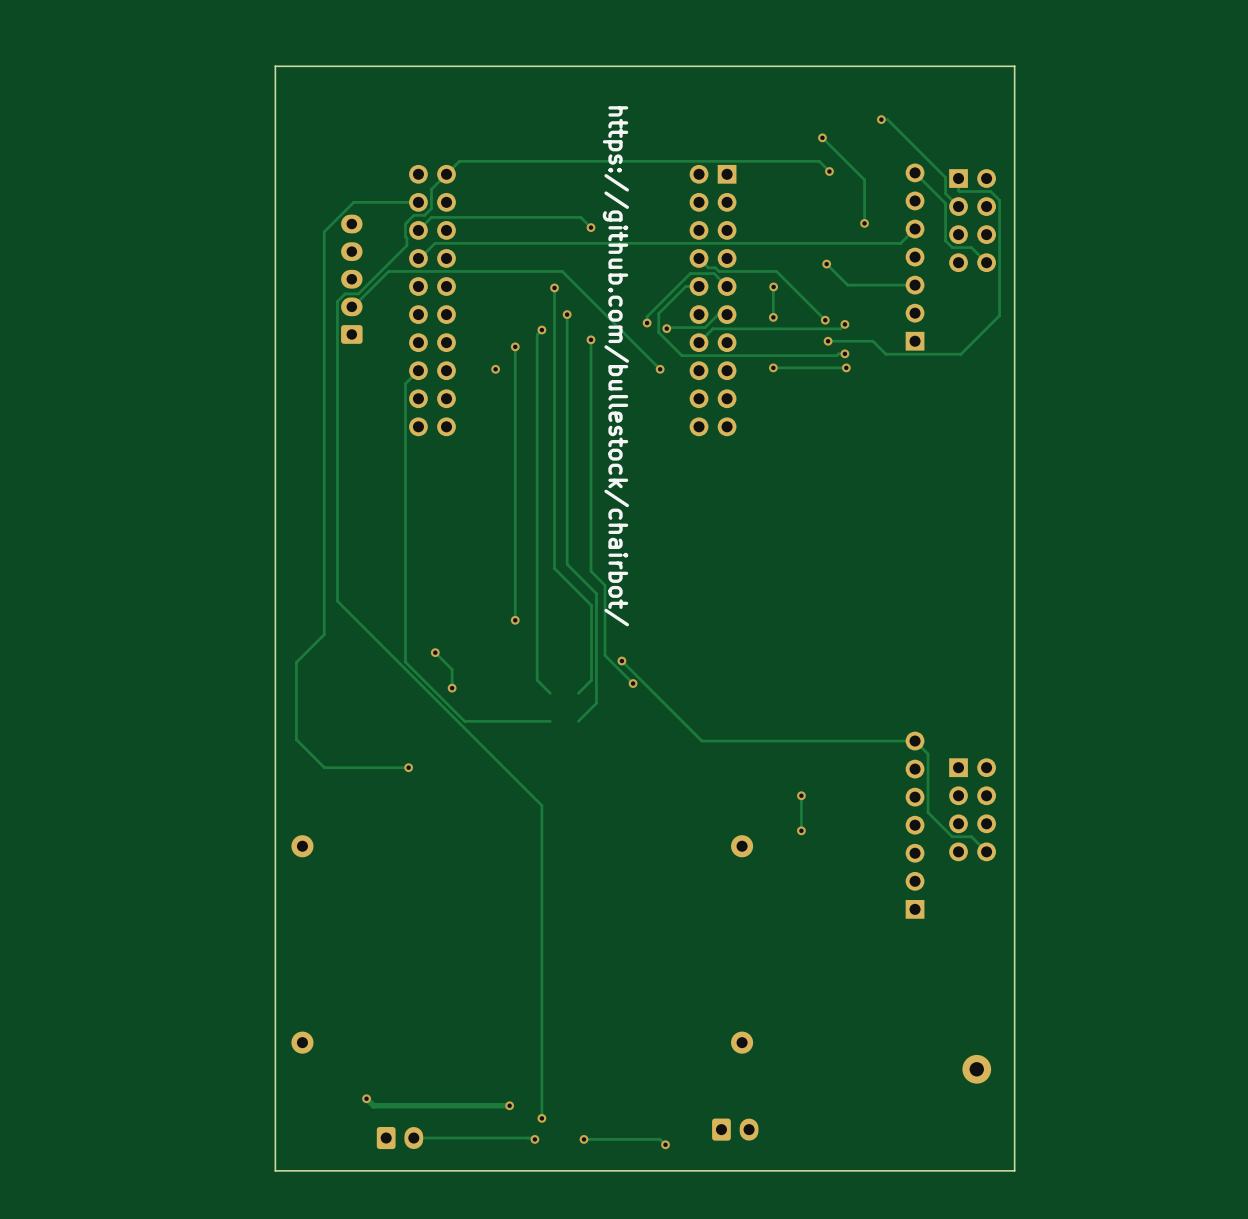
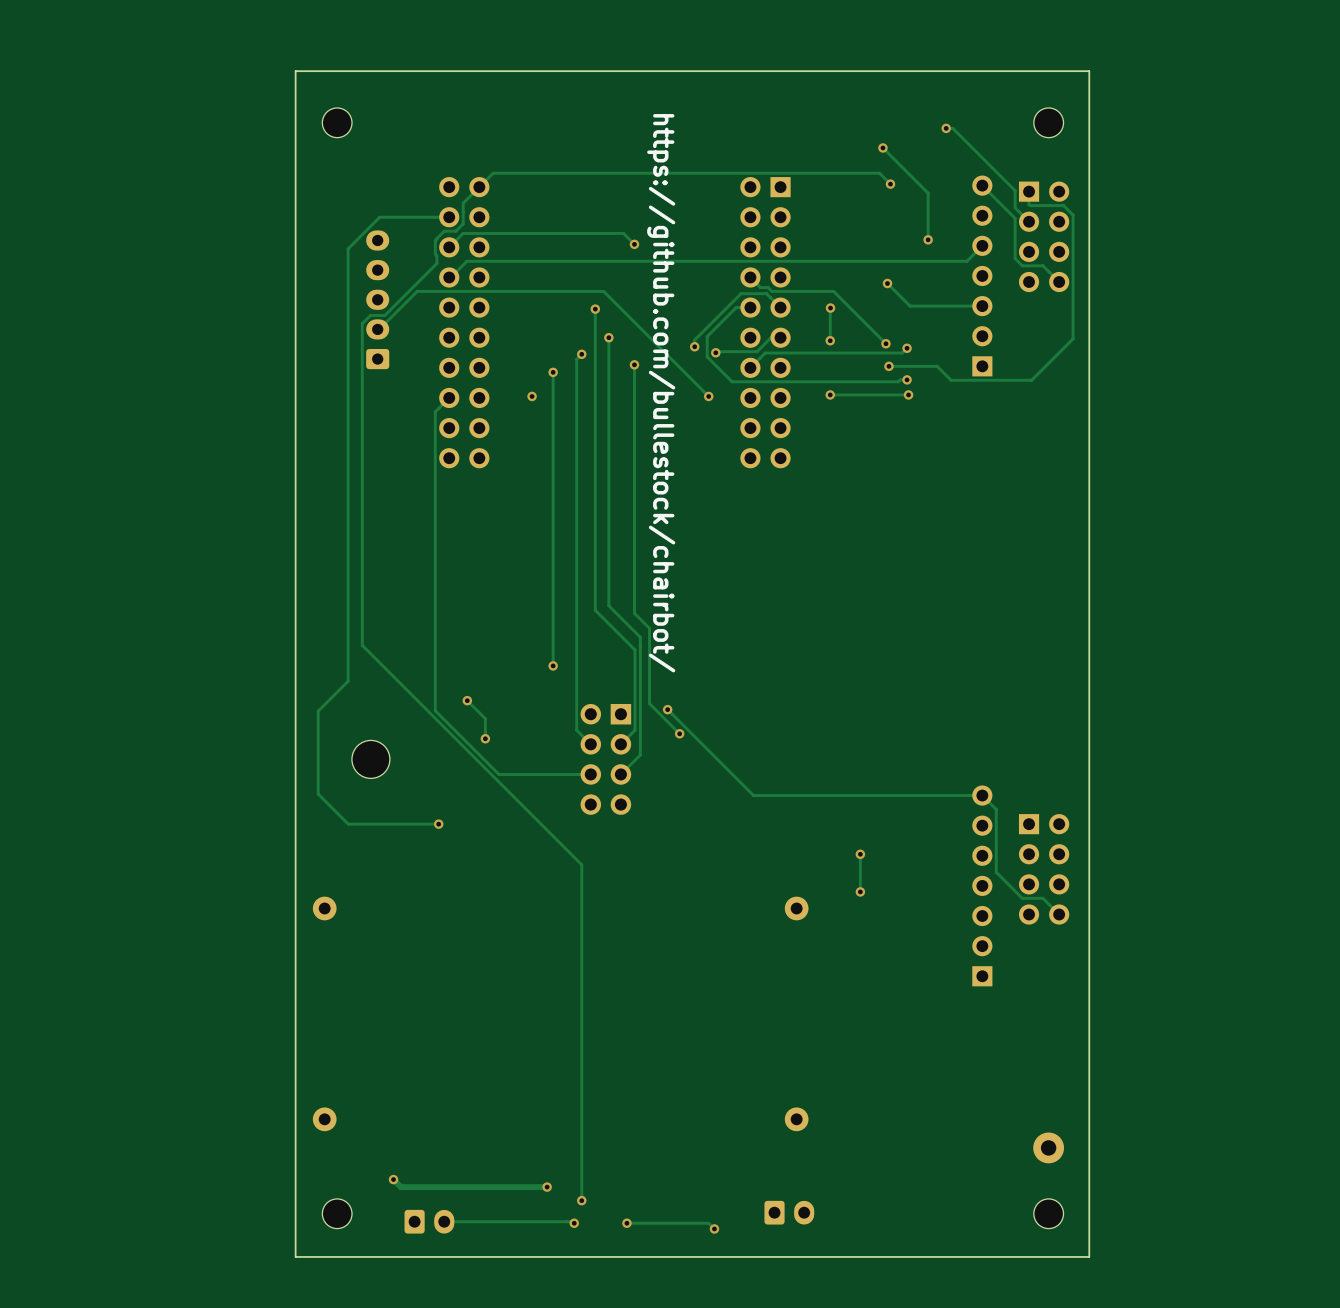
part: none -> (337, 122)
part: none -> (1048, 122)
part: none -> (370, 759)
part: none -> (605, 759)
part: none -> (337, 1213)
part: none -> (1048, 1213)

